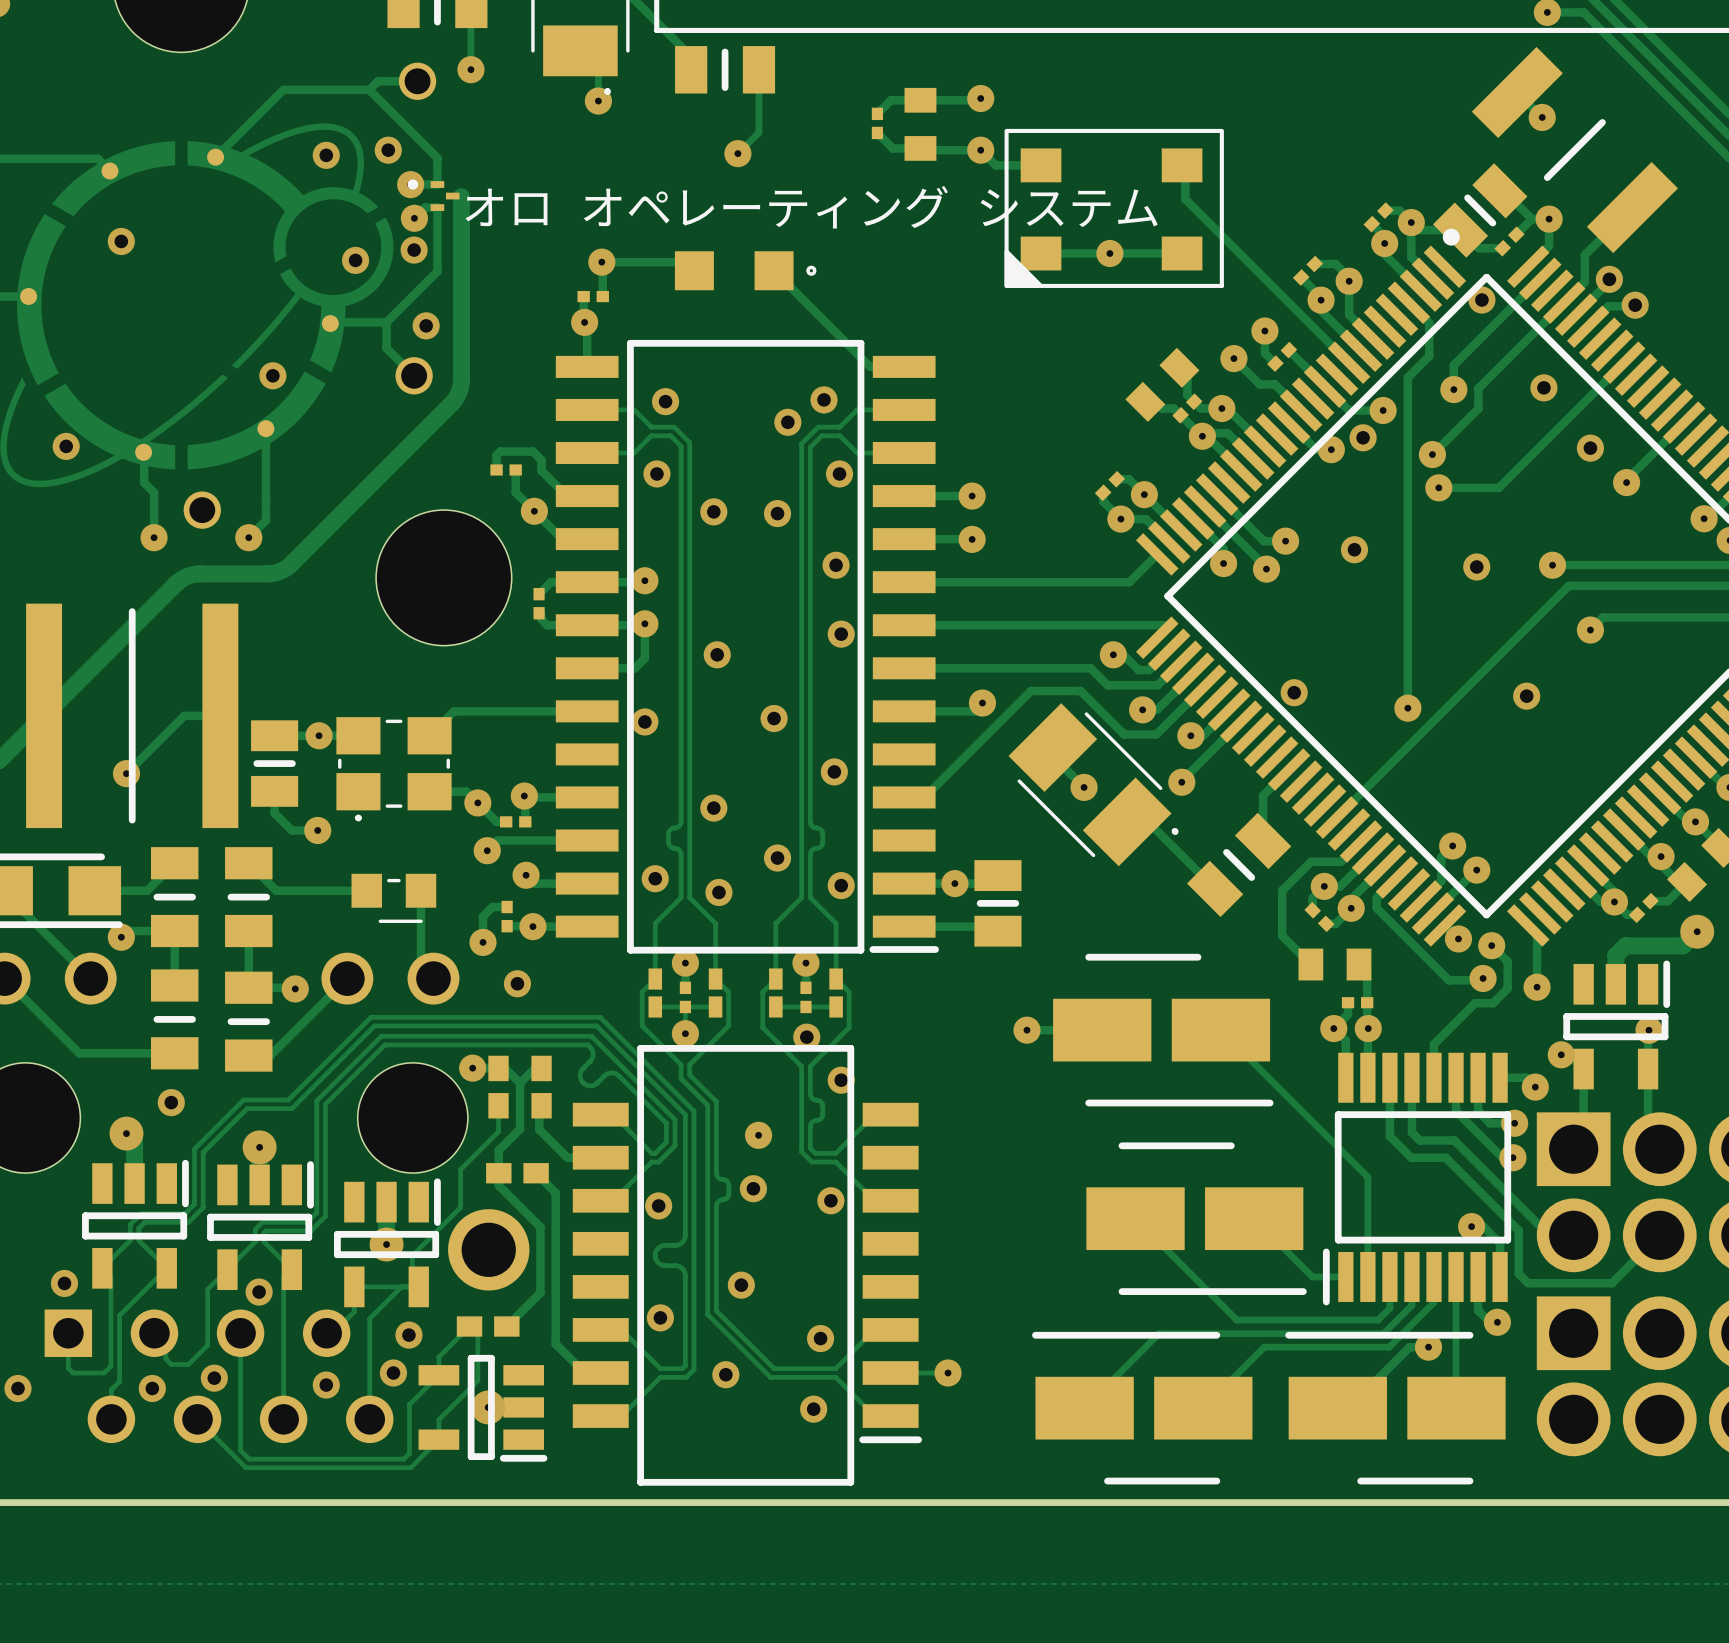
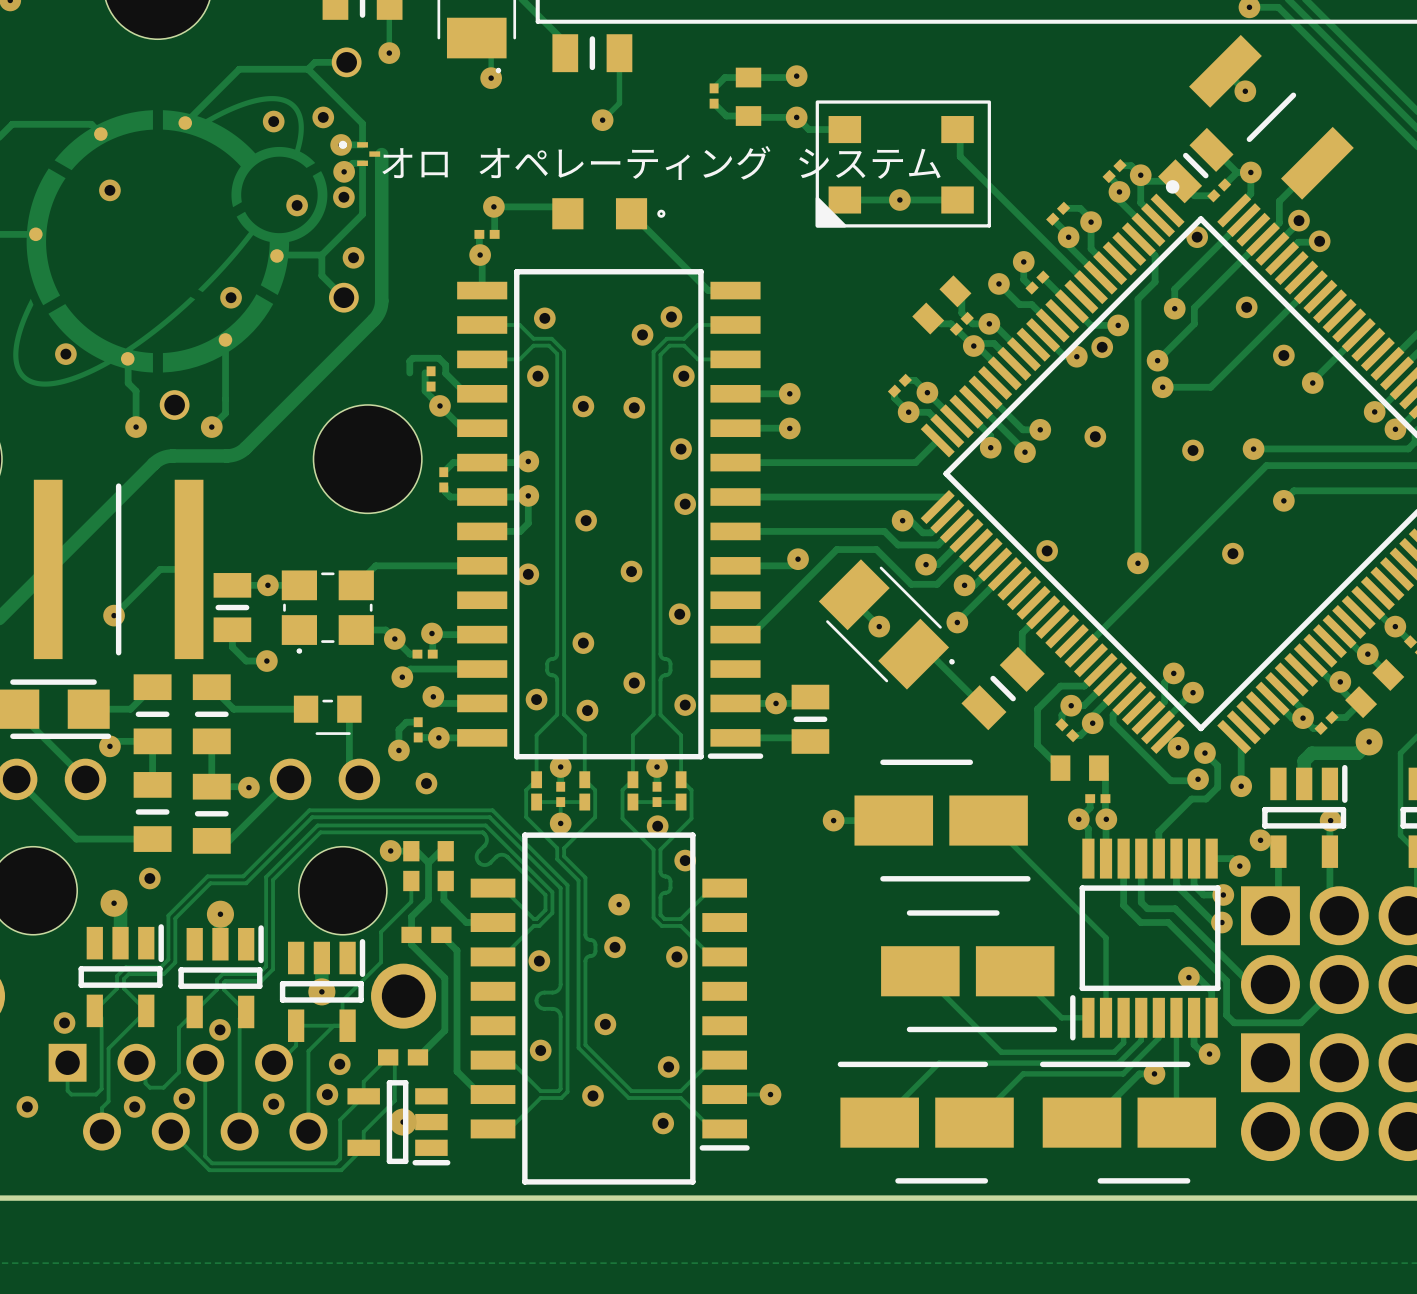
part rotation: 0° (506, 469) -> 90° clockwise (431, 378)

